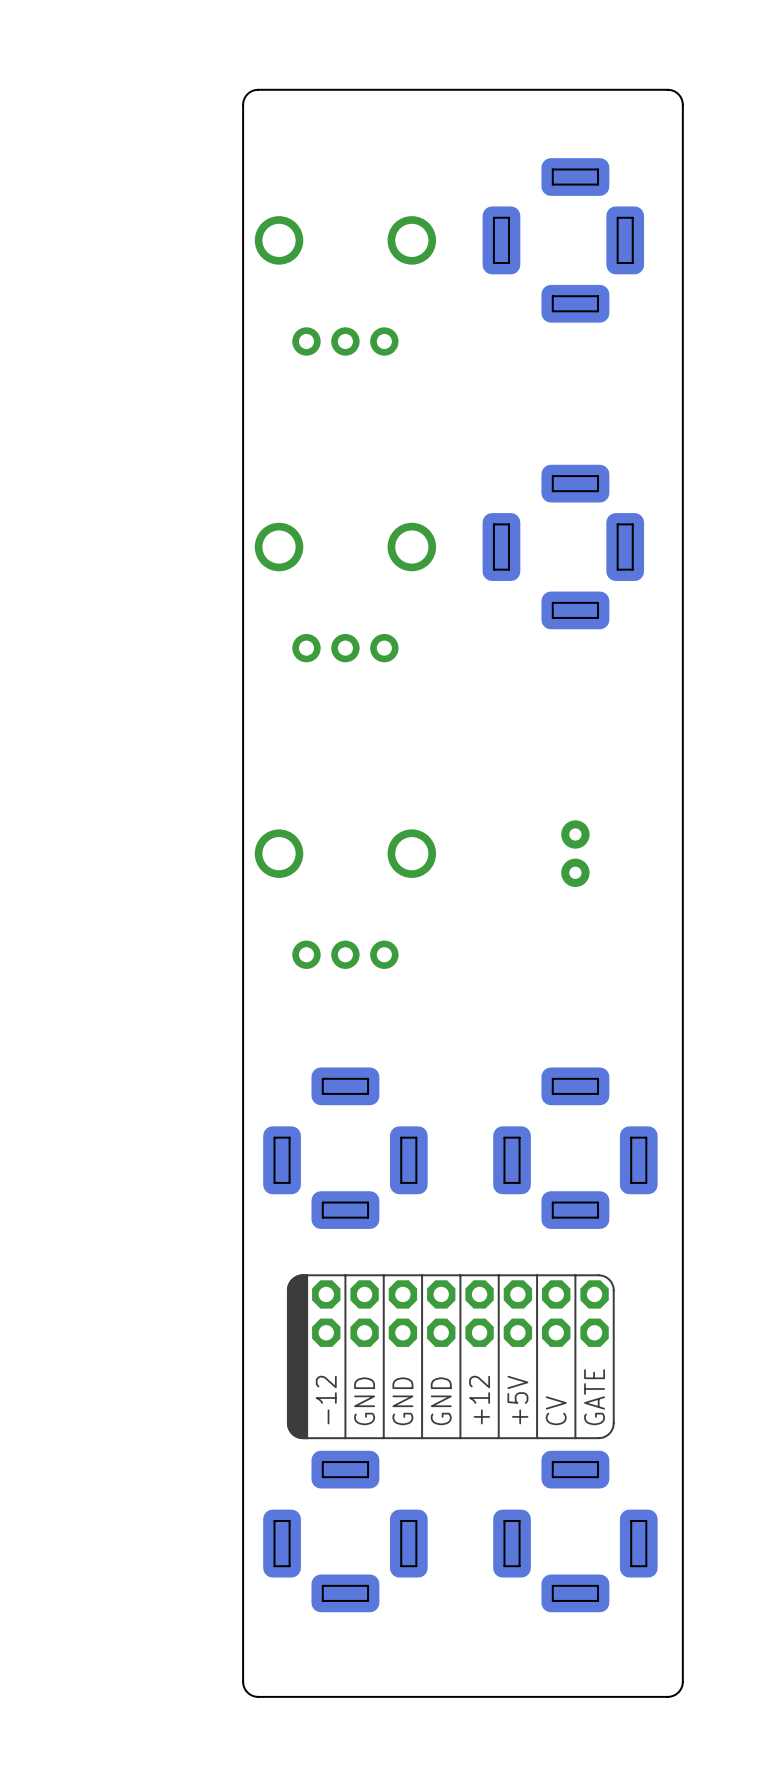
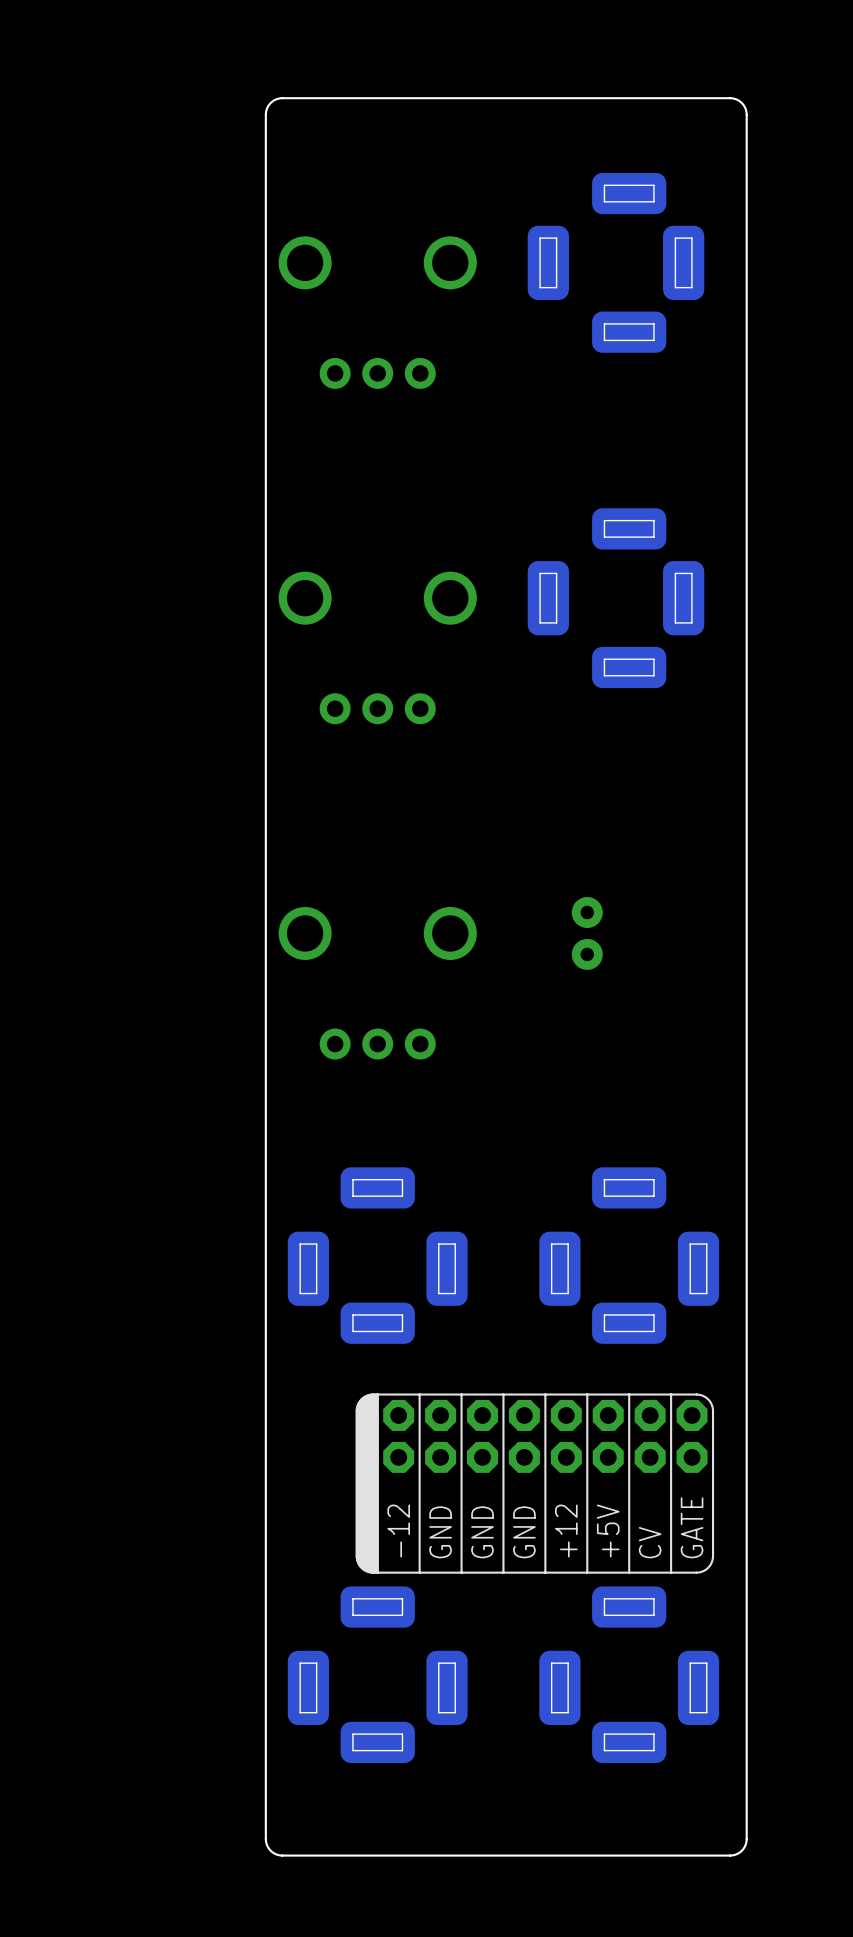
part position: (575, 853) -> (587, 933)
part position: (450, 1356) -> (534, 1483)

